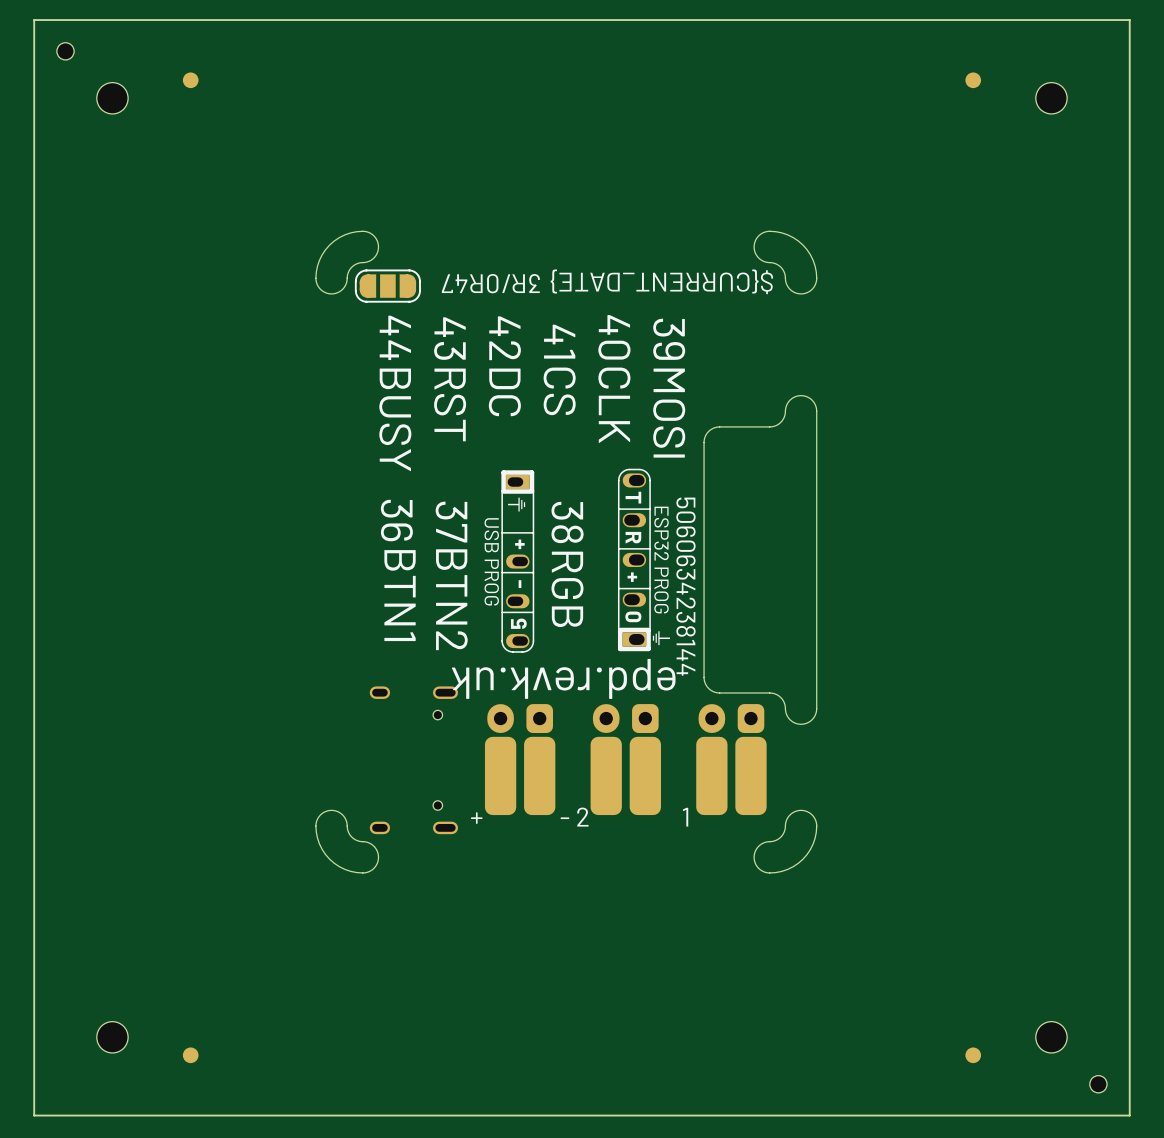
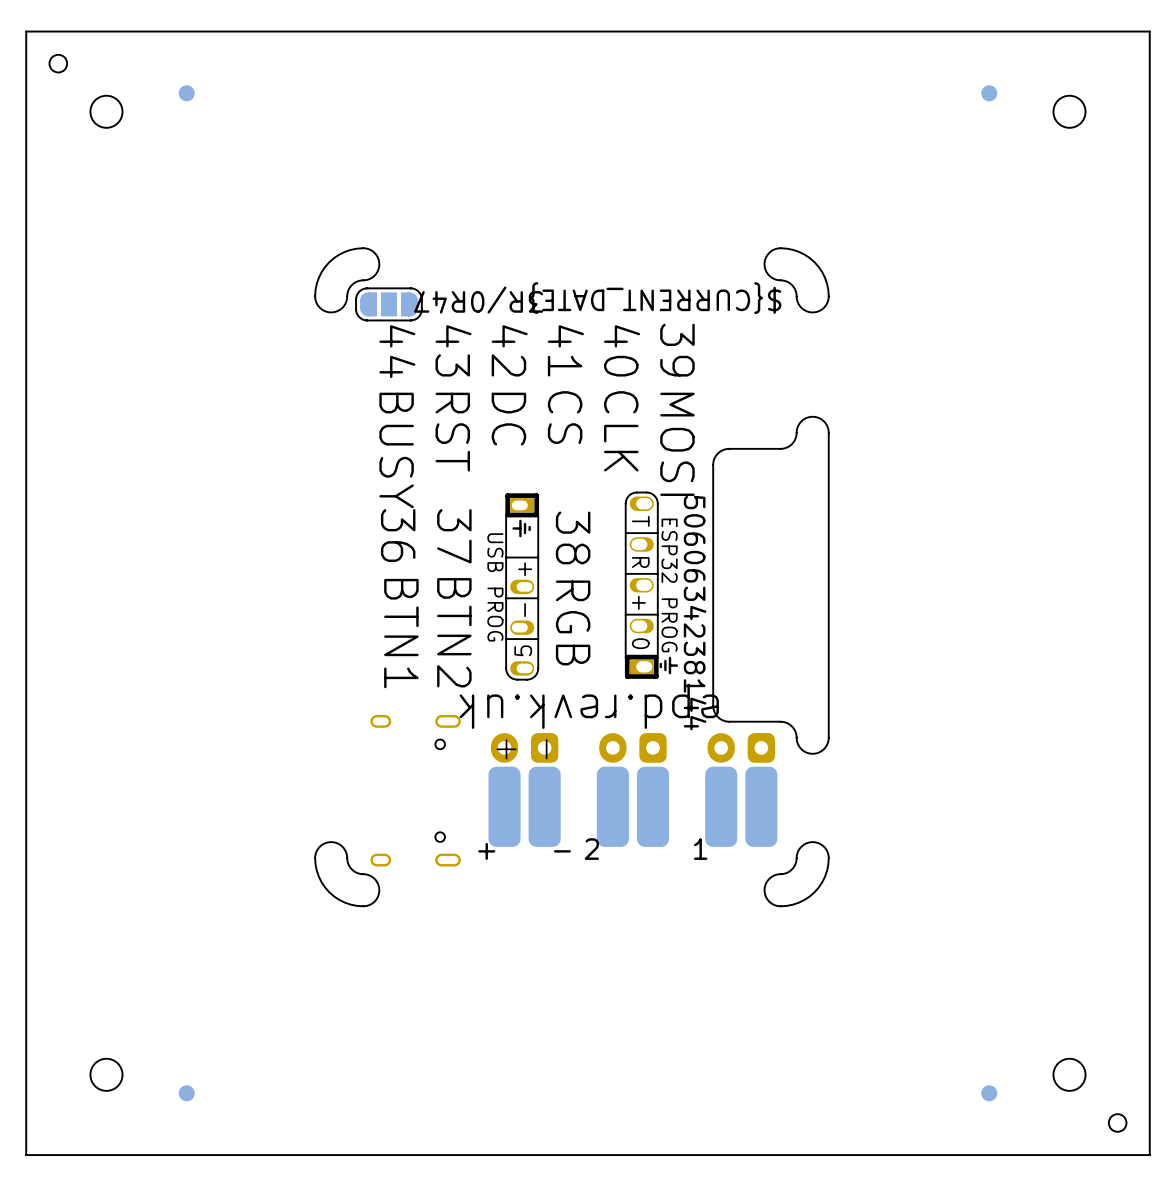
part value: none -> + (506, 749)
part value: none -> - (546, 749)

